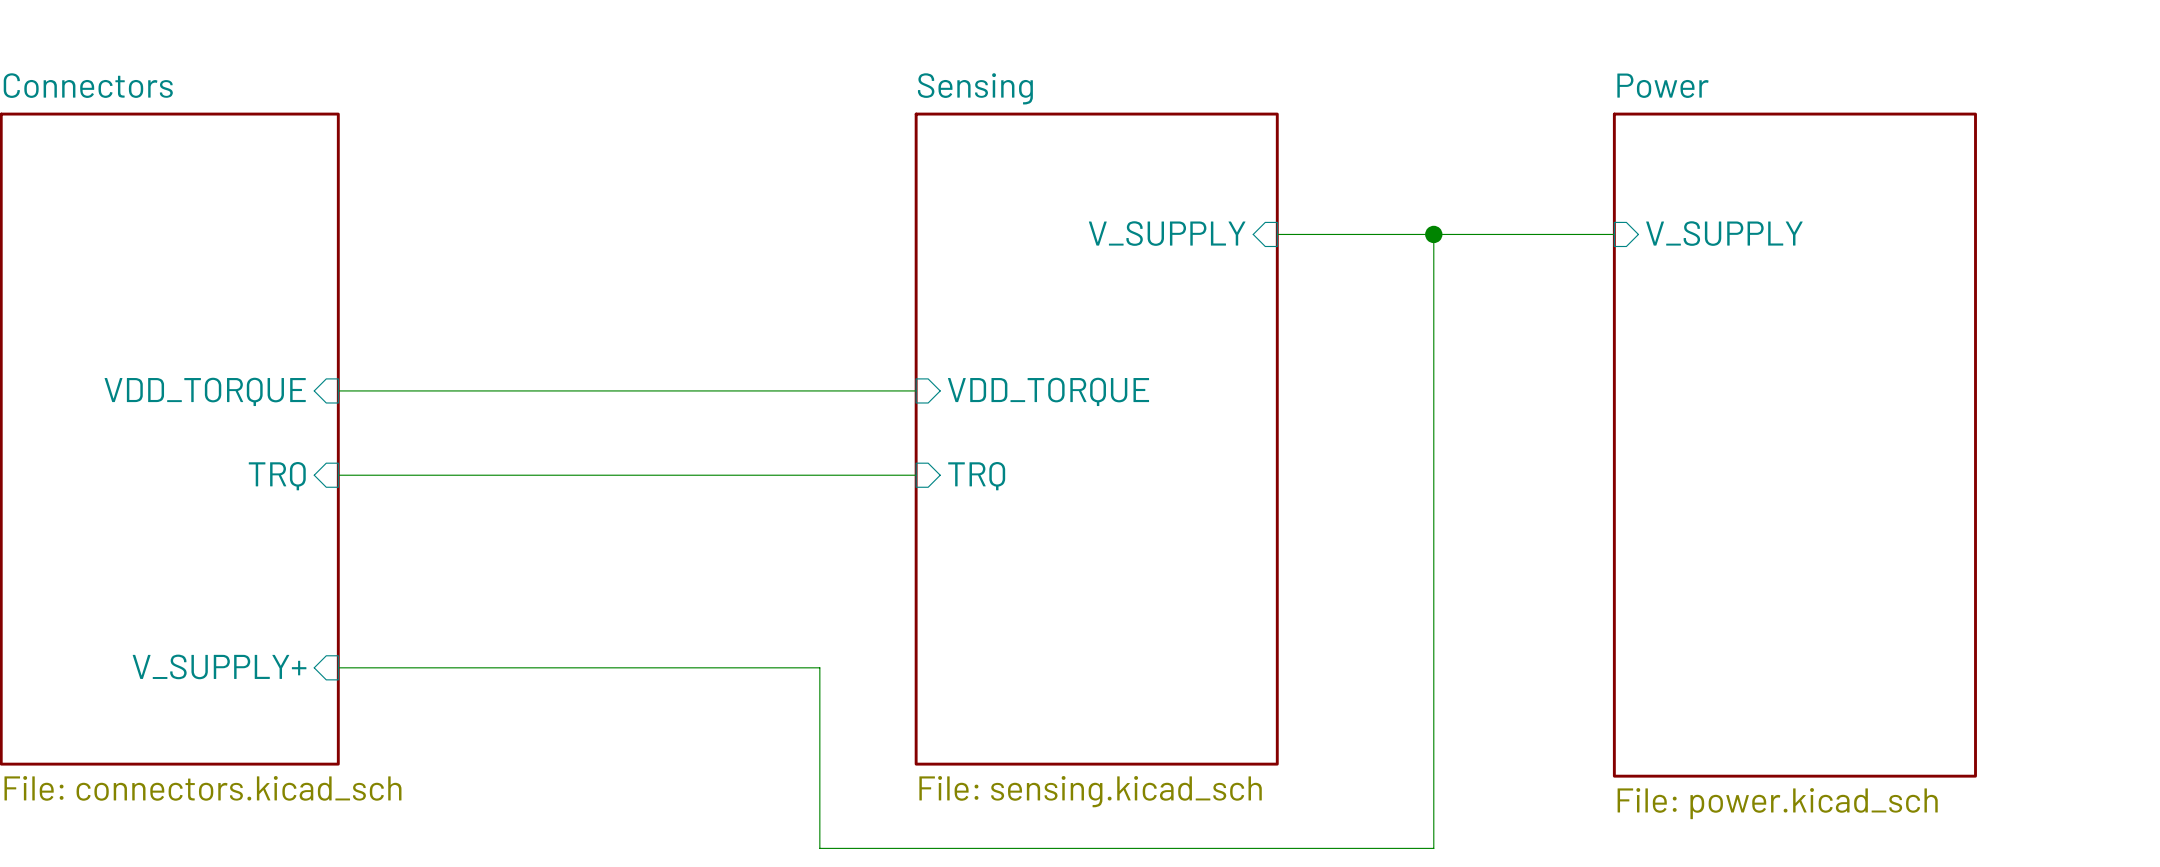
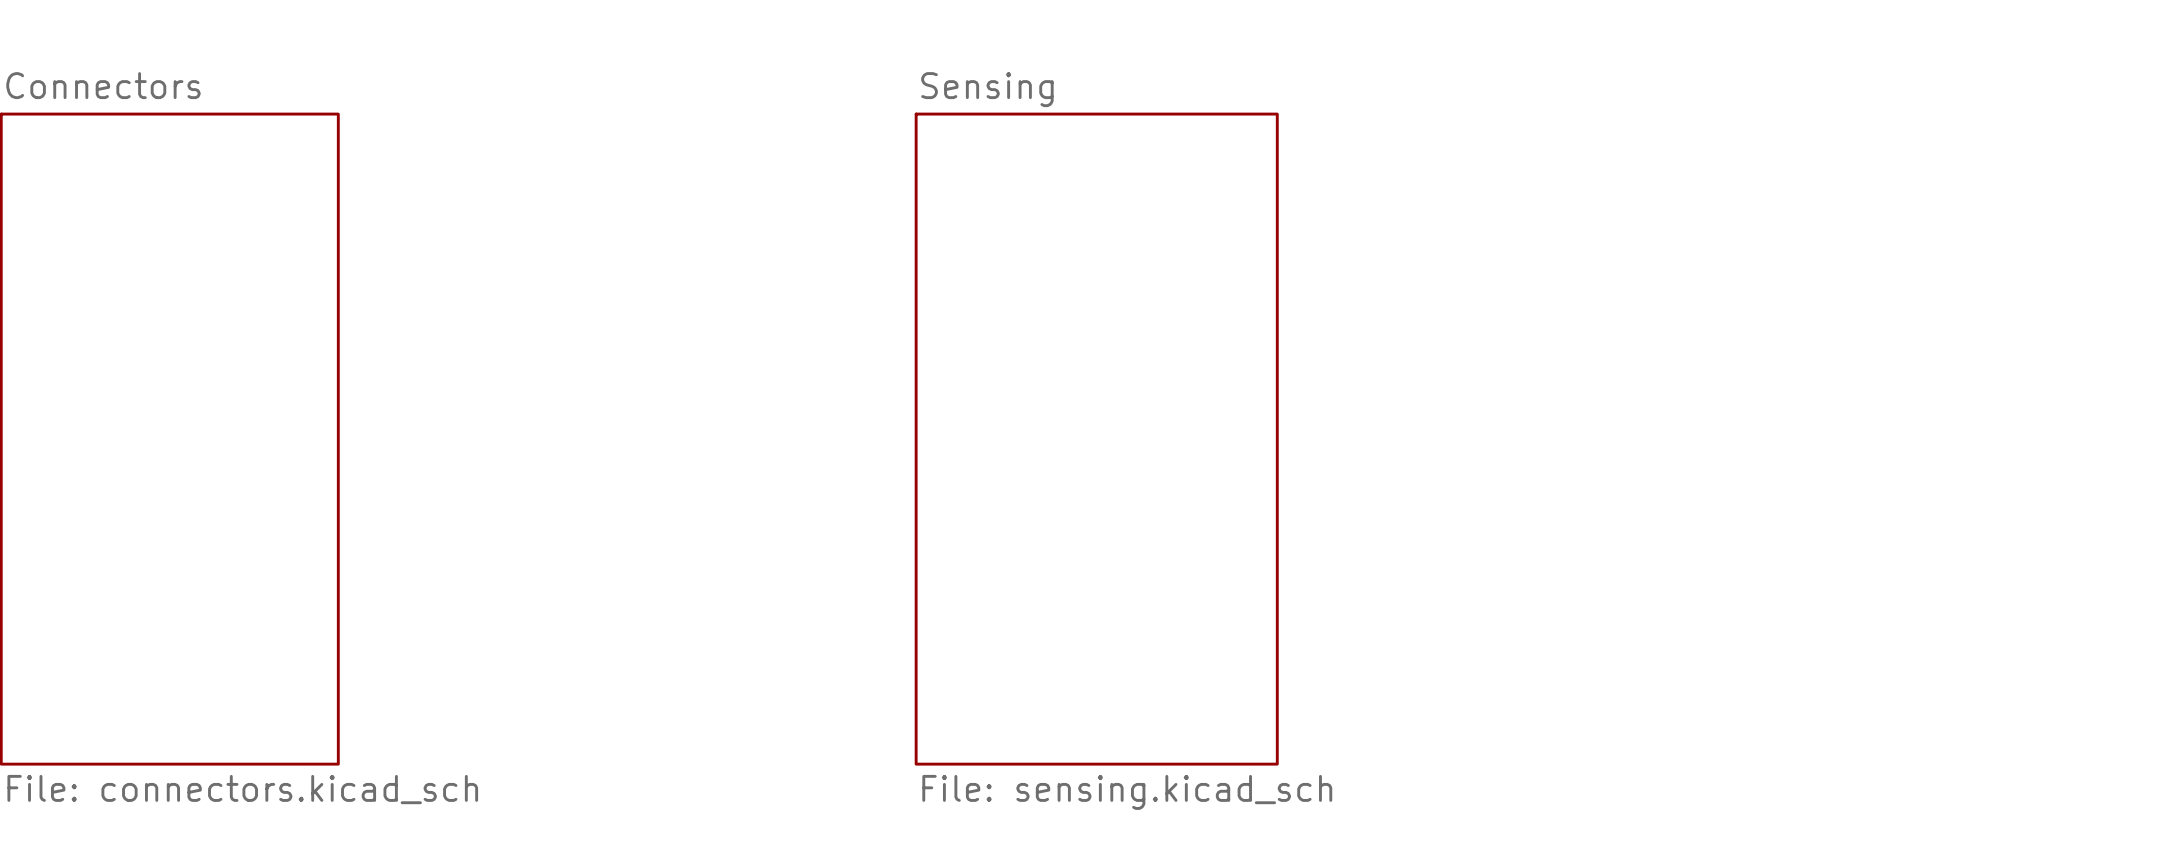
sheet pin: V_SUPPLY (1167, 233) -> none
sheet pin: V_SUPPLY (1724, 233) -> none
wire: (1277, 234) (1614, 234) -> none
wire: (1433, 234) (1433, 848) (819, 848) (819, 667) (338, 667) -> none
junction: (1433, 234) -> none
wire: (338, 390) (916, 390) -> none
sheet pin: VDD_TORQUE (205, 391) -> none
sheet pin: VDD_TORQUE (1048, 391) -> none
sheet Power: File: power.kicad_sch (1794, 445) -> none
wire: (338, 475) (916, 475) -> none
sheet pin: TRQ (277, 476) -> none
sheet pin: TRQ (976, 476) -> none
sheet pin: V_SUPPLY+ (219, 666) -> none

